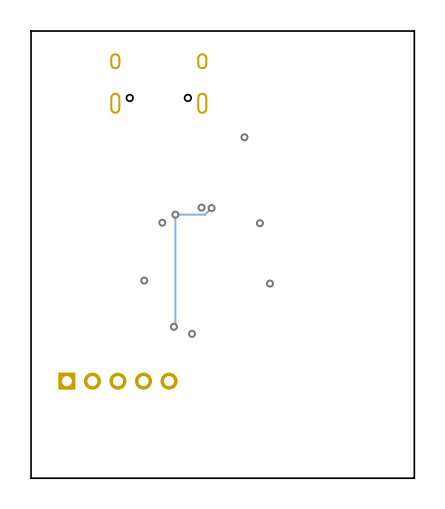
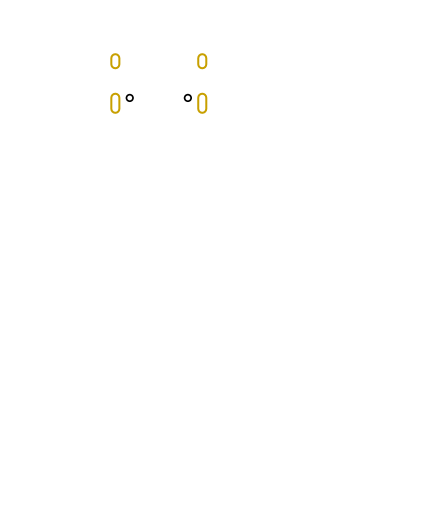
board edge: (414, 31) (31, 31) (31, 478) (414, 478) (414, 31) -> none
via: (244, 137) -> none
via: (201, 207) -> none
track: (211, 208) (205, 214) (175, 214) (175, 325) -> none
via: (211, 208) -> none
via: (175, 214) -> none
via: (162, 222) -> none
via: (259, 223) -> none
via: (144, 280) -> none
via: (269, 283) -> none
via: (173, 326) -> none
via: (192, 333) -> none
part: (117, 381) -> none

